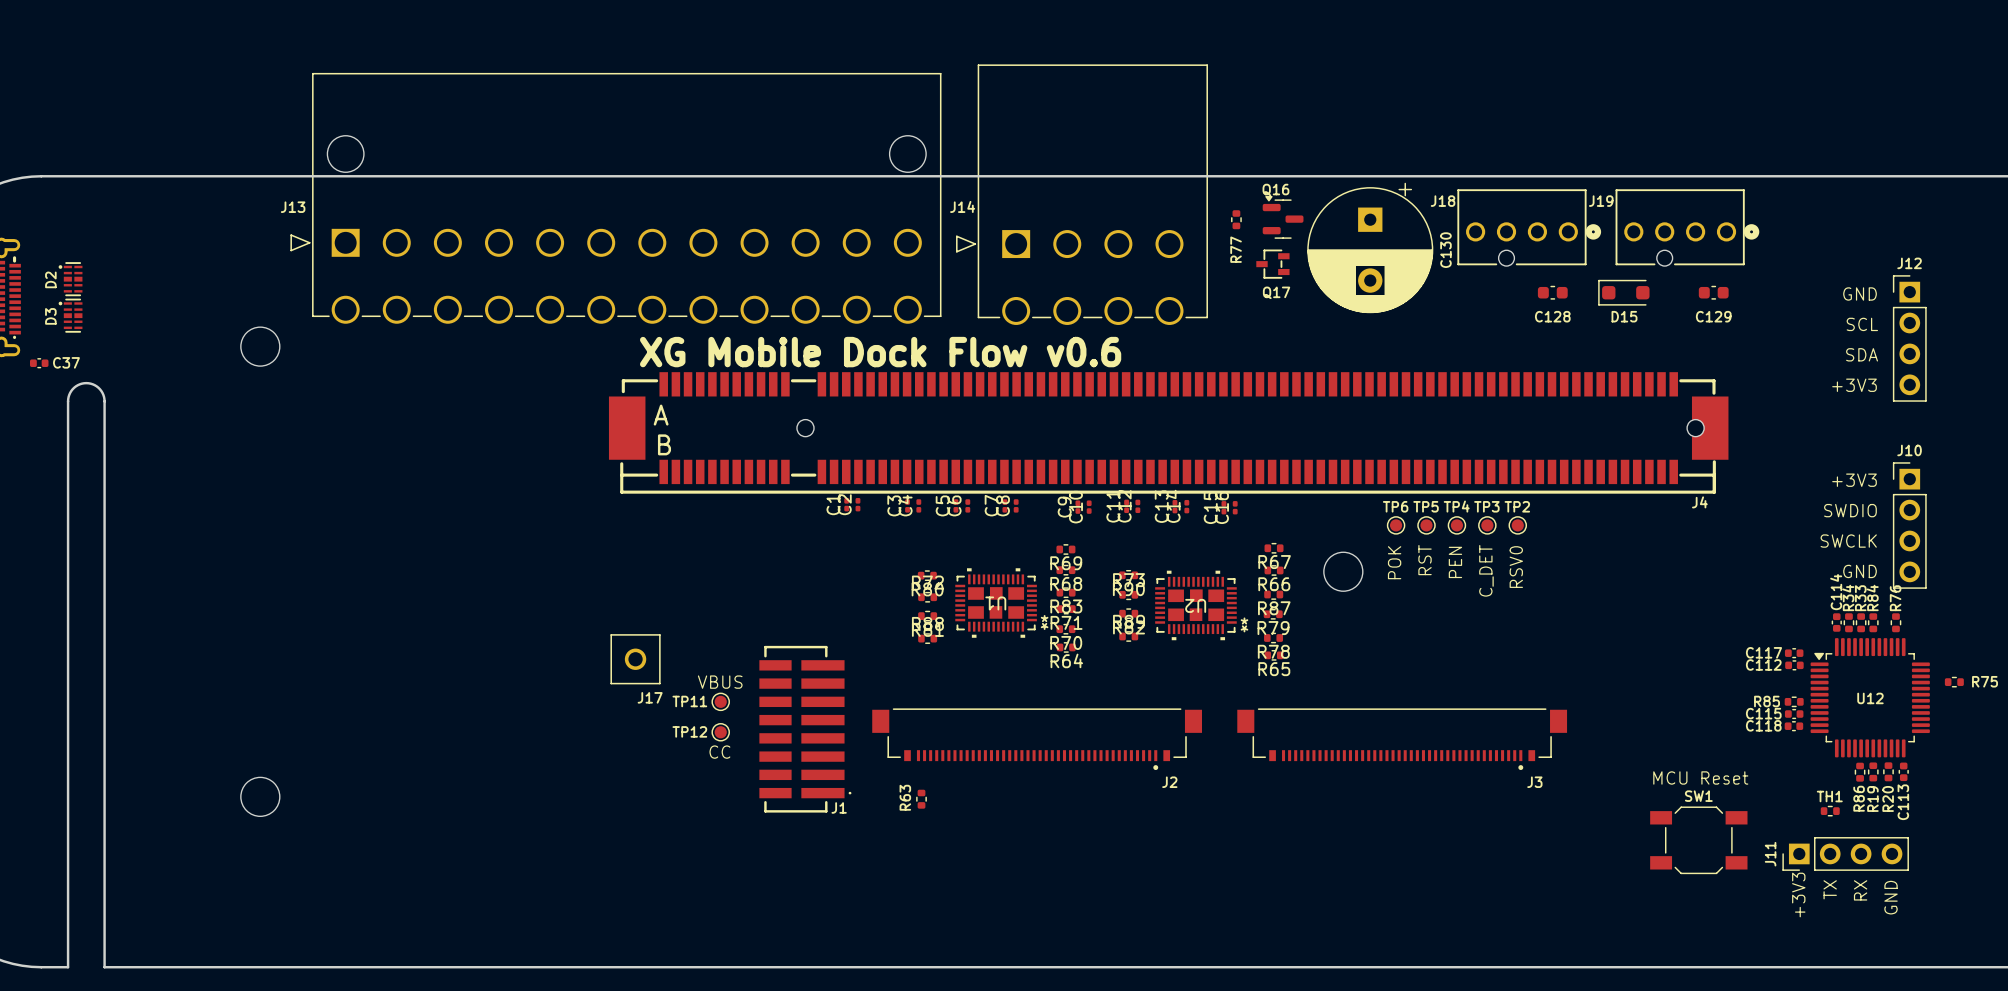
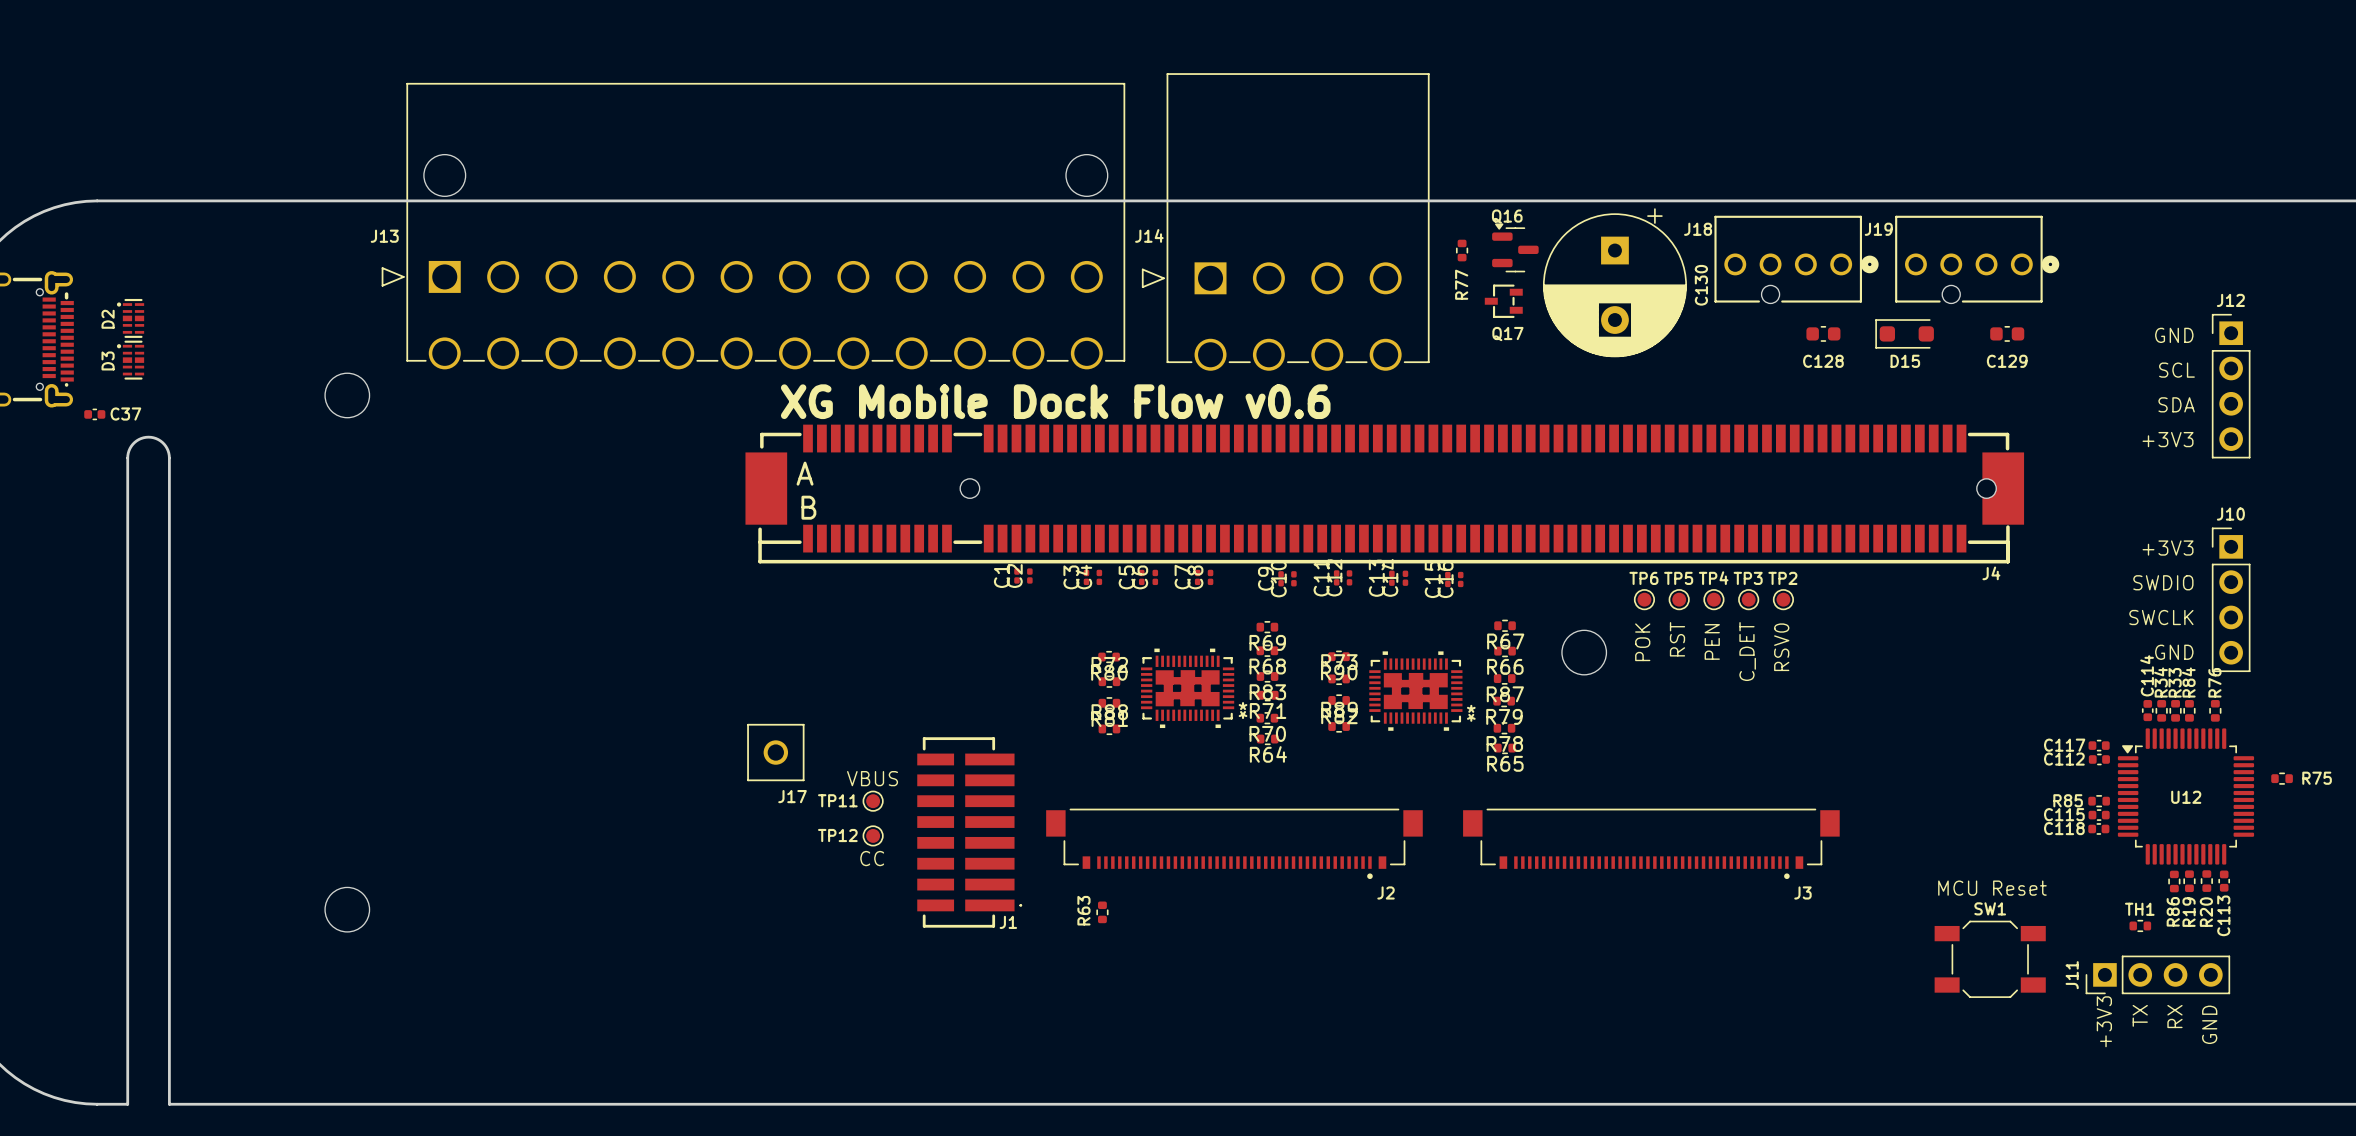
U1: (996, 603) -> none
part: none -> (1187, 688)
U2: (1195, 605) -> none
part: none -> (1415, 691)

